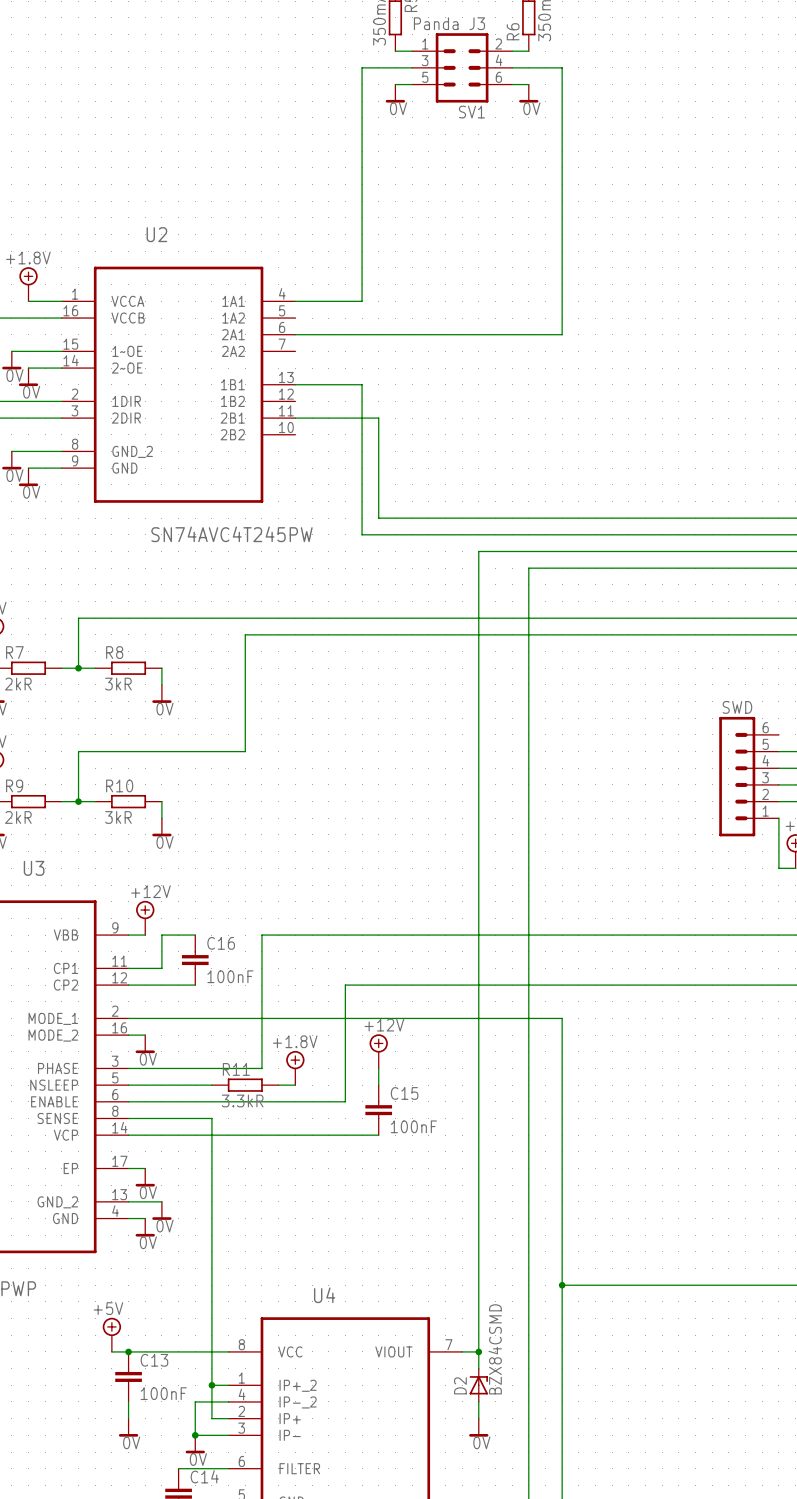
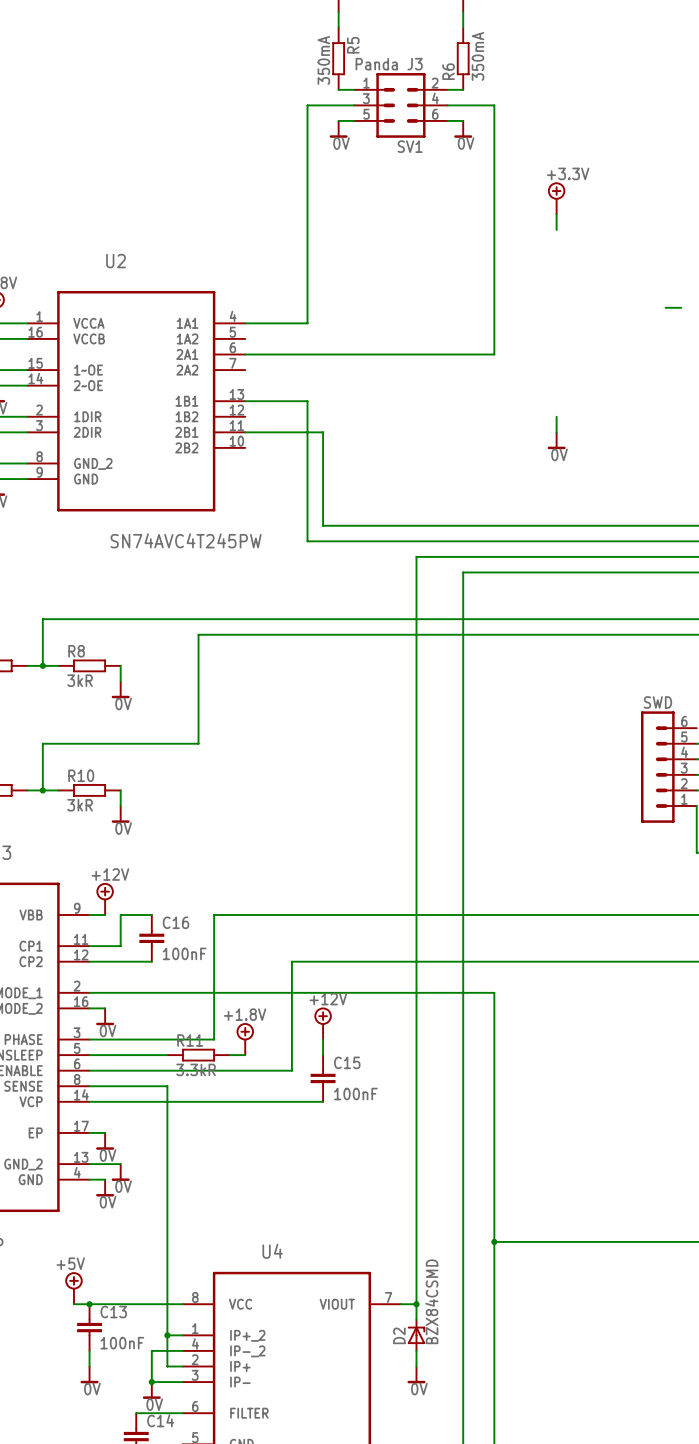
power symbol: none -> +3.3V (556, 198)
wire: none -> (556, 214) (556, 229)
wire: none -> (665, 307) (681, 307)
wire: none -> (556, 416) (556, 432)
power symbol: none -> 0V (556, 440)

